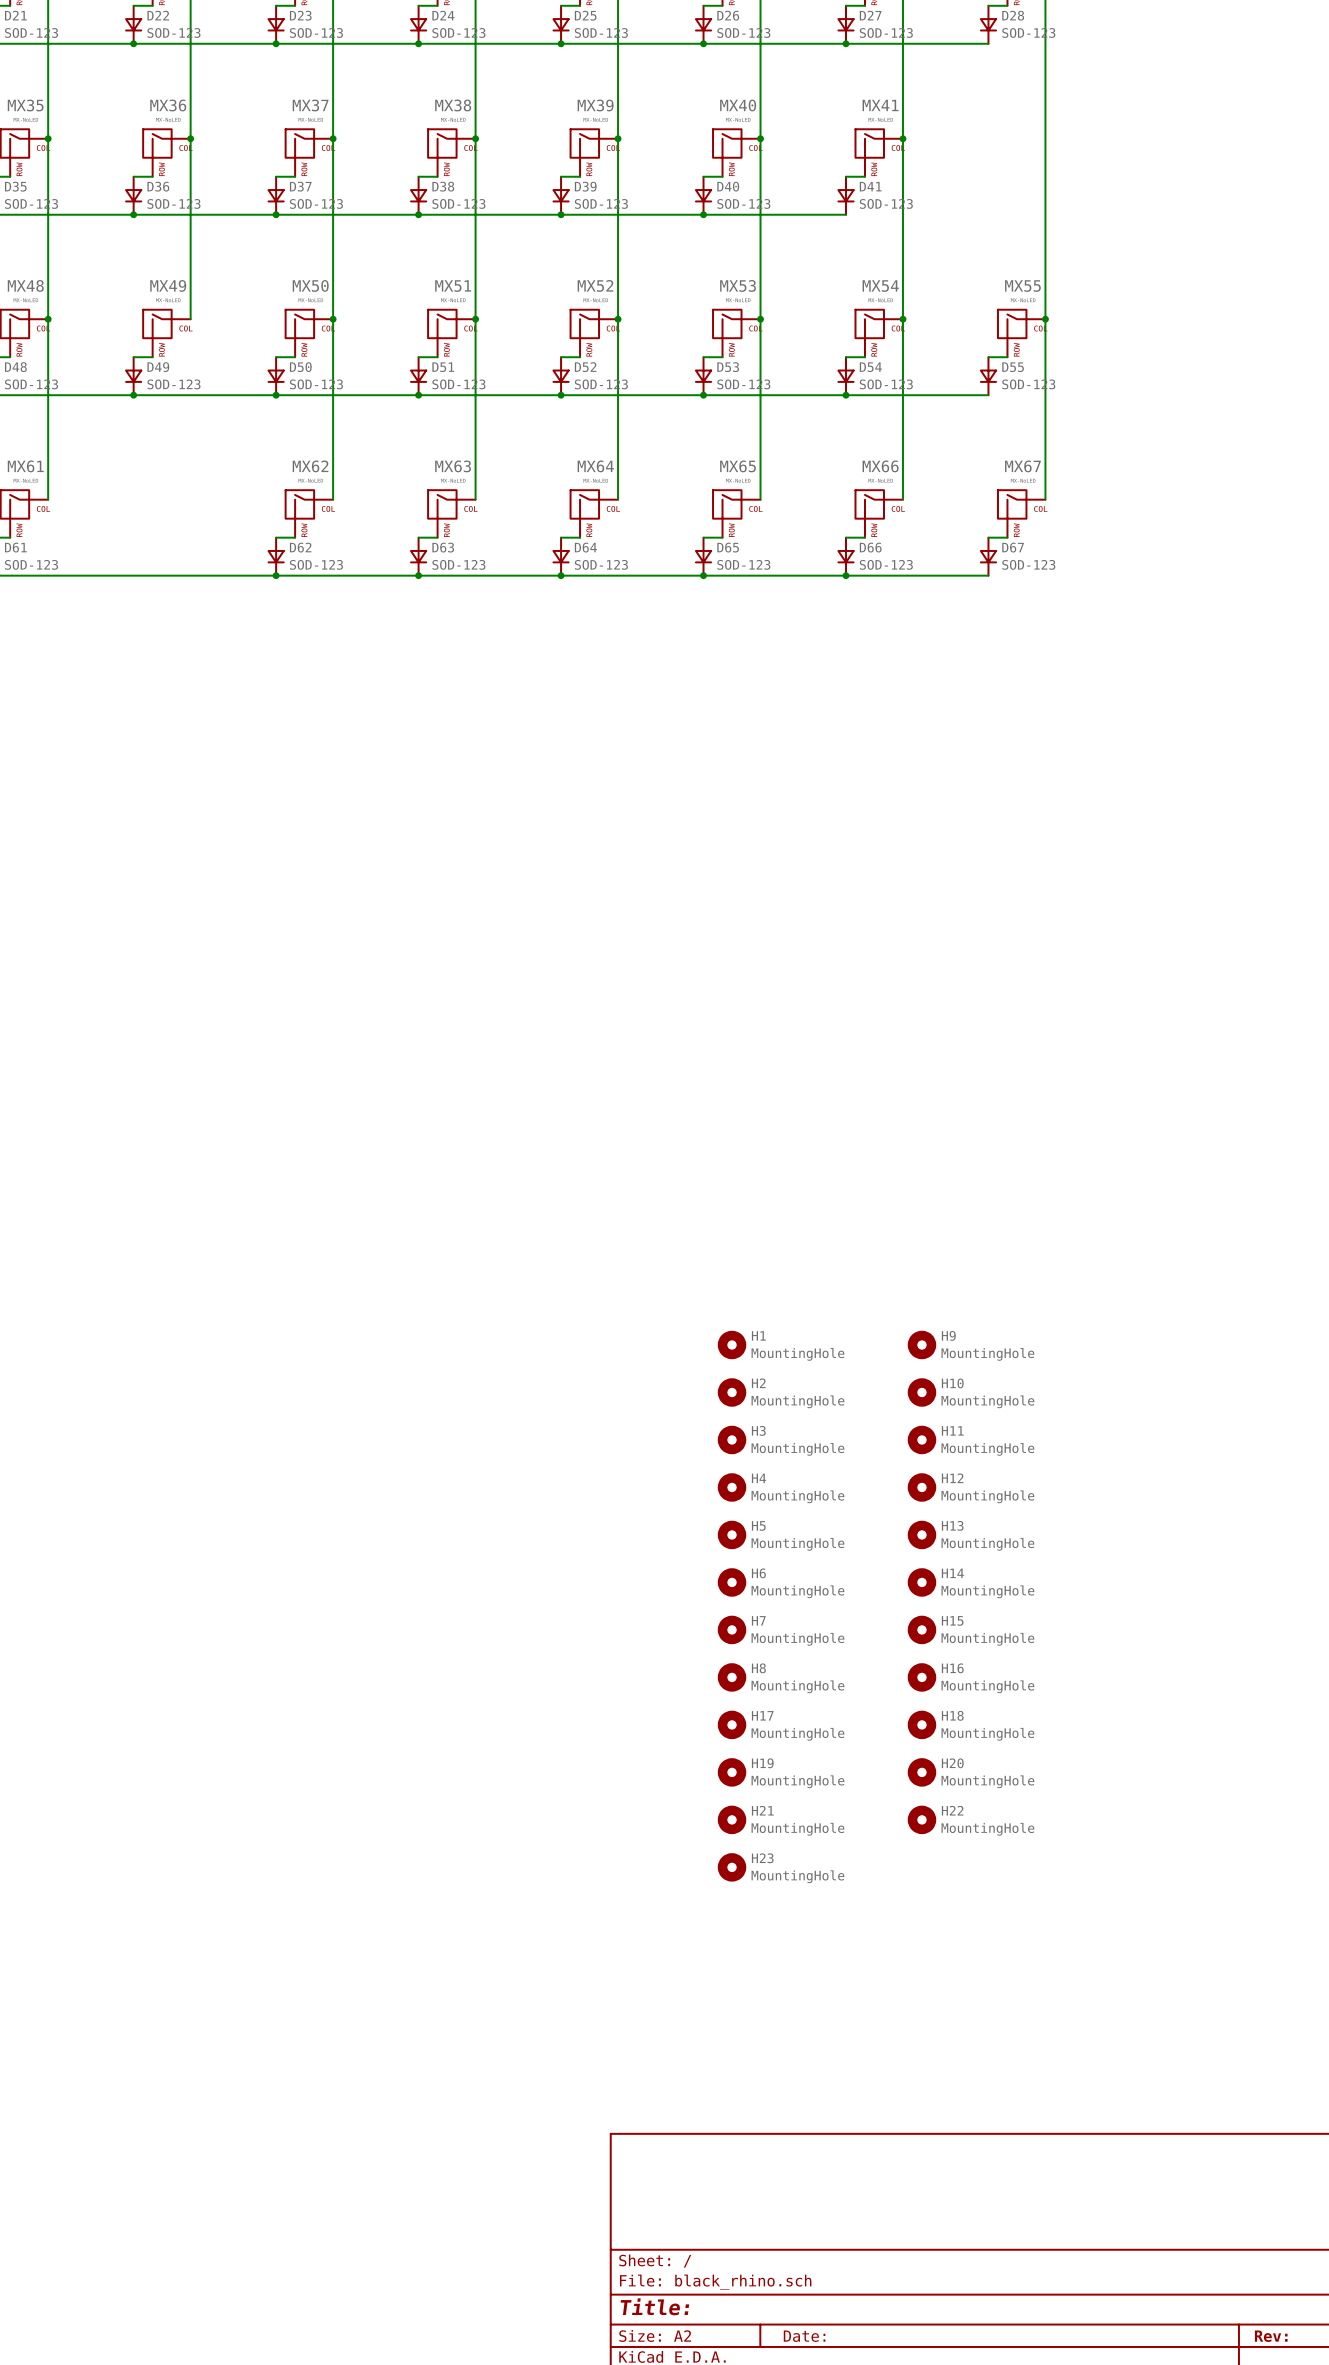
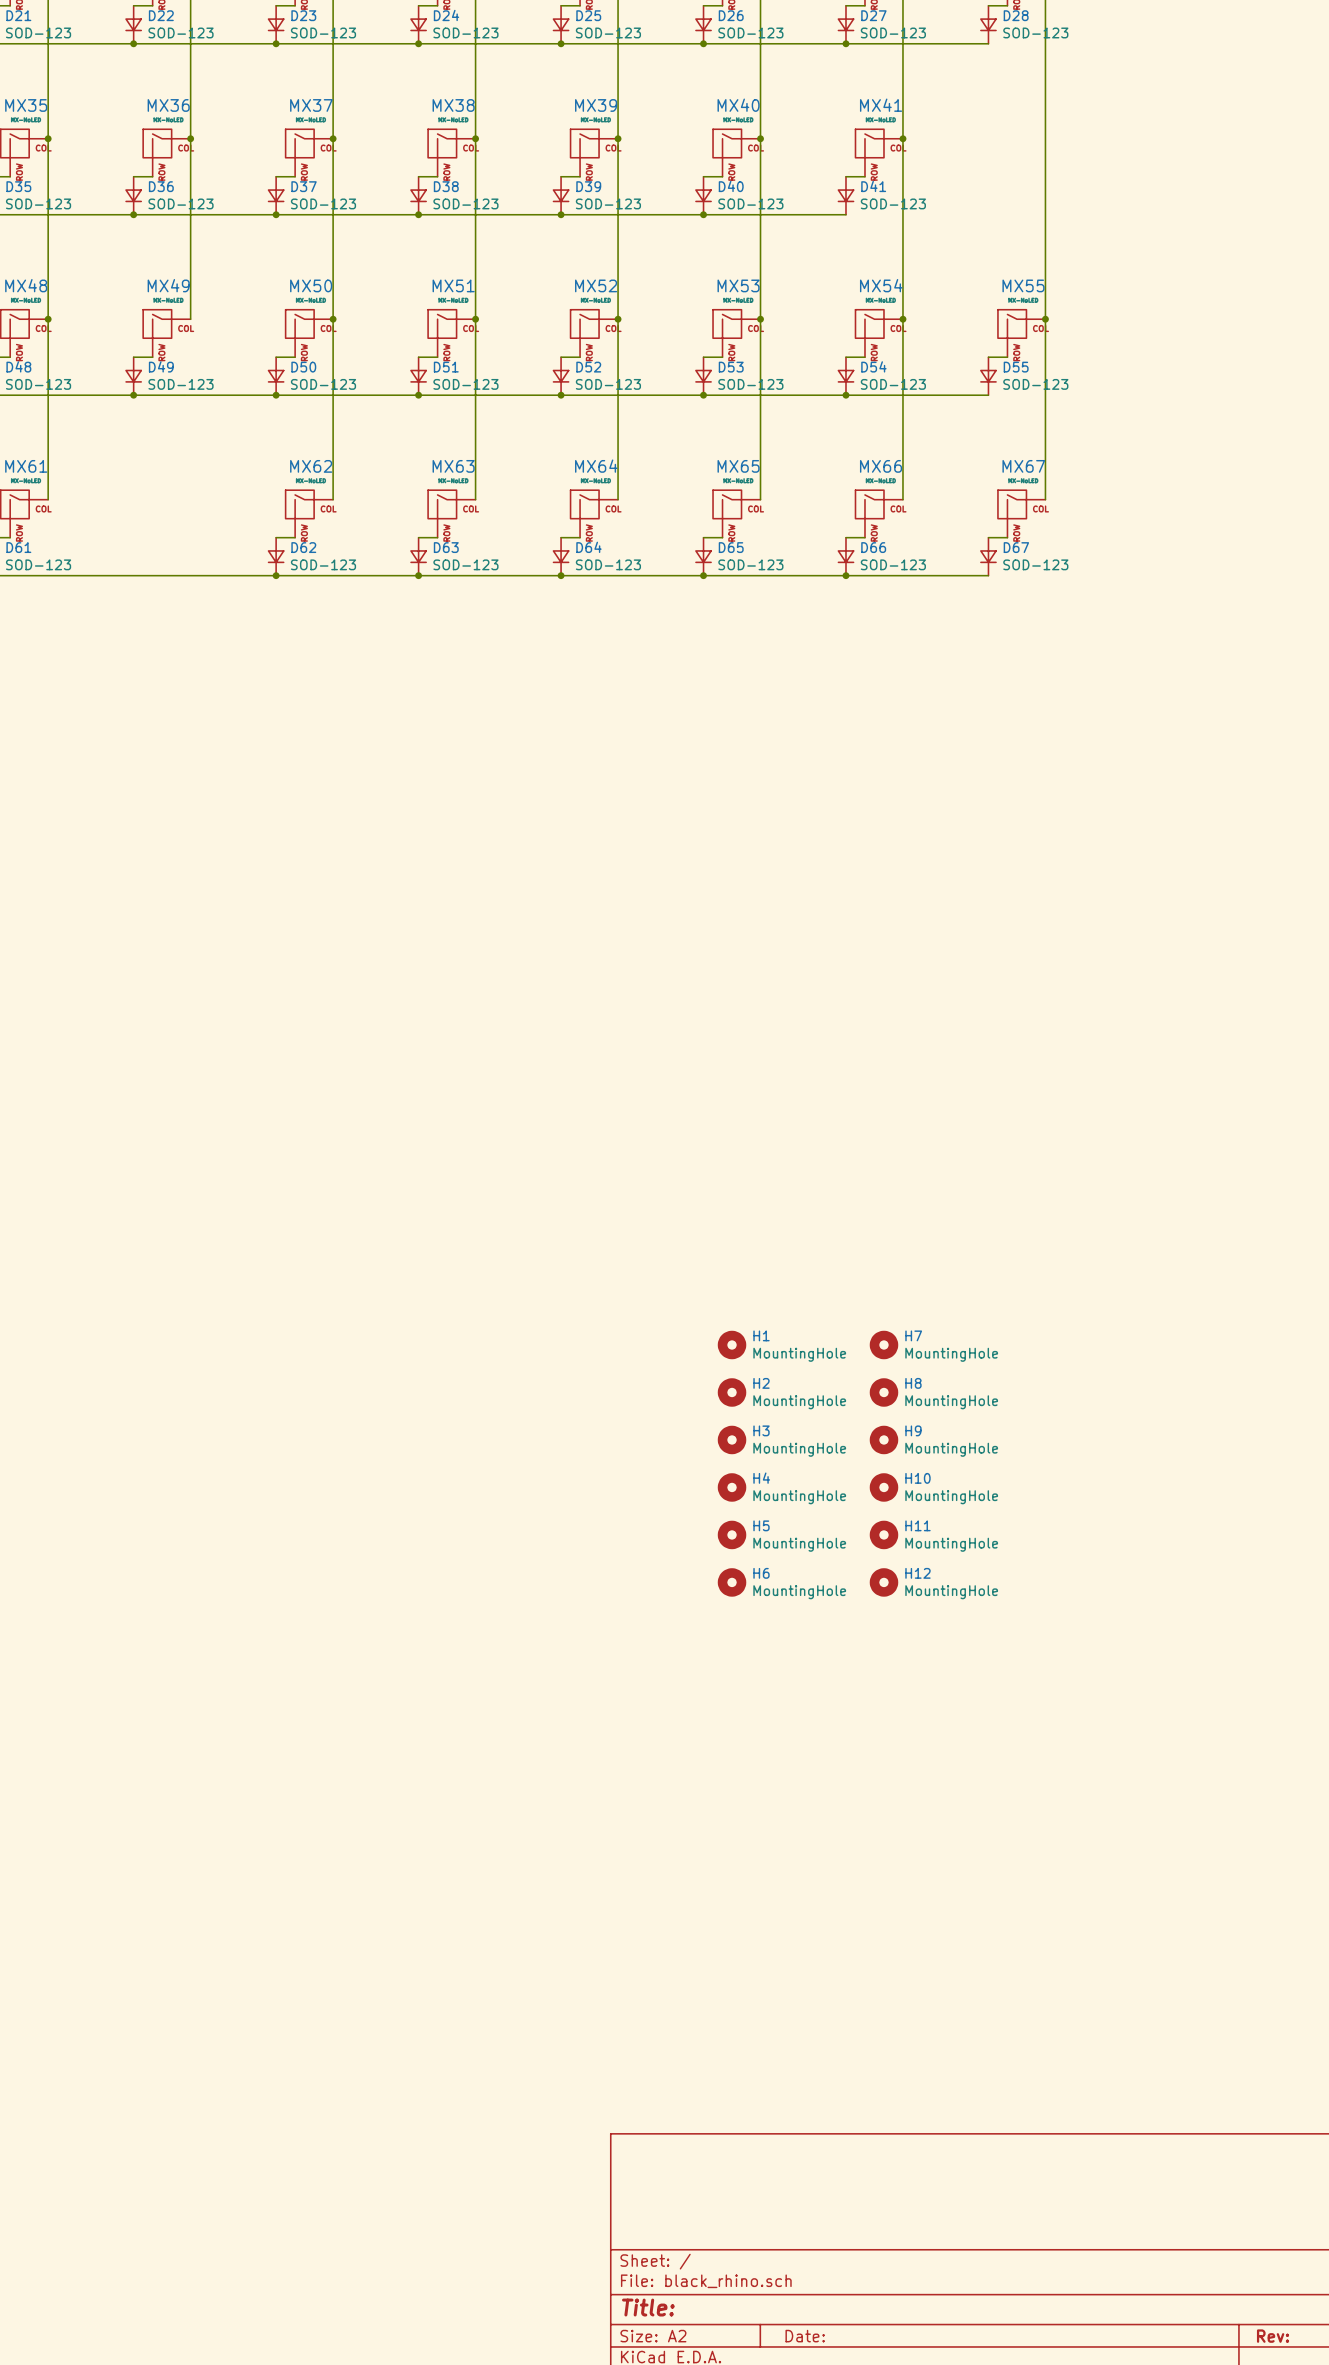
H9 position: (921, 1345) -> (883, 1439)
H10 position: (921, 1392) -> (883, 1487)
H11 position: (921, 1439) -> (883, 1534)
H12 position: (921, 1487) -> (883, 1582)
H13: MountingHole (921, 1534) -> none
H14: MountingHole (921, 1582) -> none
H7 position: (732, 1629) -> (883, 1345)
H15: MountingHole (921, 1629) -> none
H8 position: (732, 1677) -> (883, 1392)
H16: MountingHole (921, 1677) -> none
H17: MountingHole (732, 1724) -> none
H18: MountingHole (921, 1724) -> none
H19: MountingHole (732, 1772) -> none
H20: MountingHole (921, 1772) -> none
H21: MountingHole (732, 1819) -> none
H22: MountingHole (921, 1819) -> none
H23: MountingHole (732, 1867) -> none

